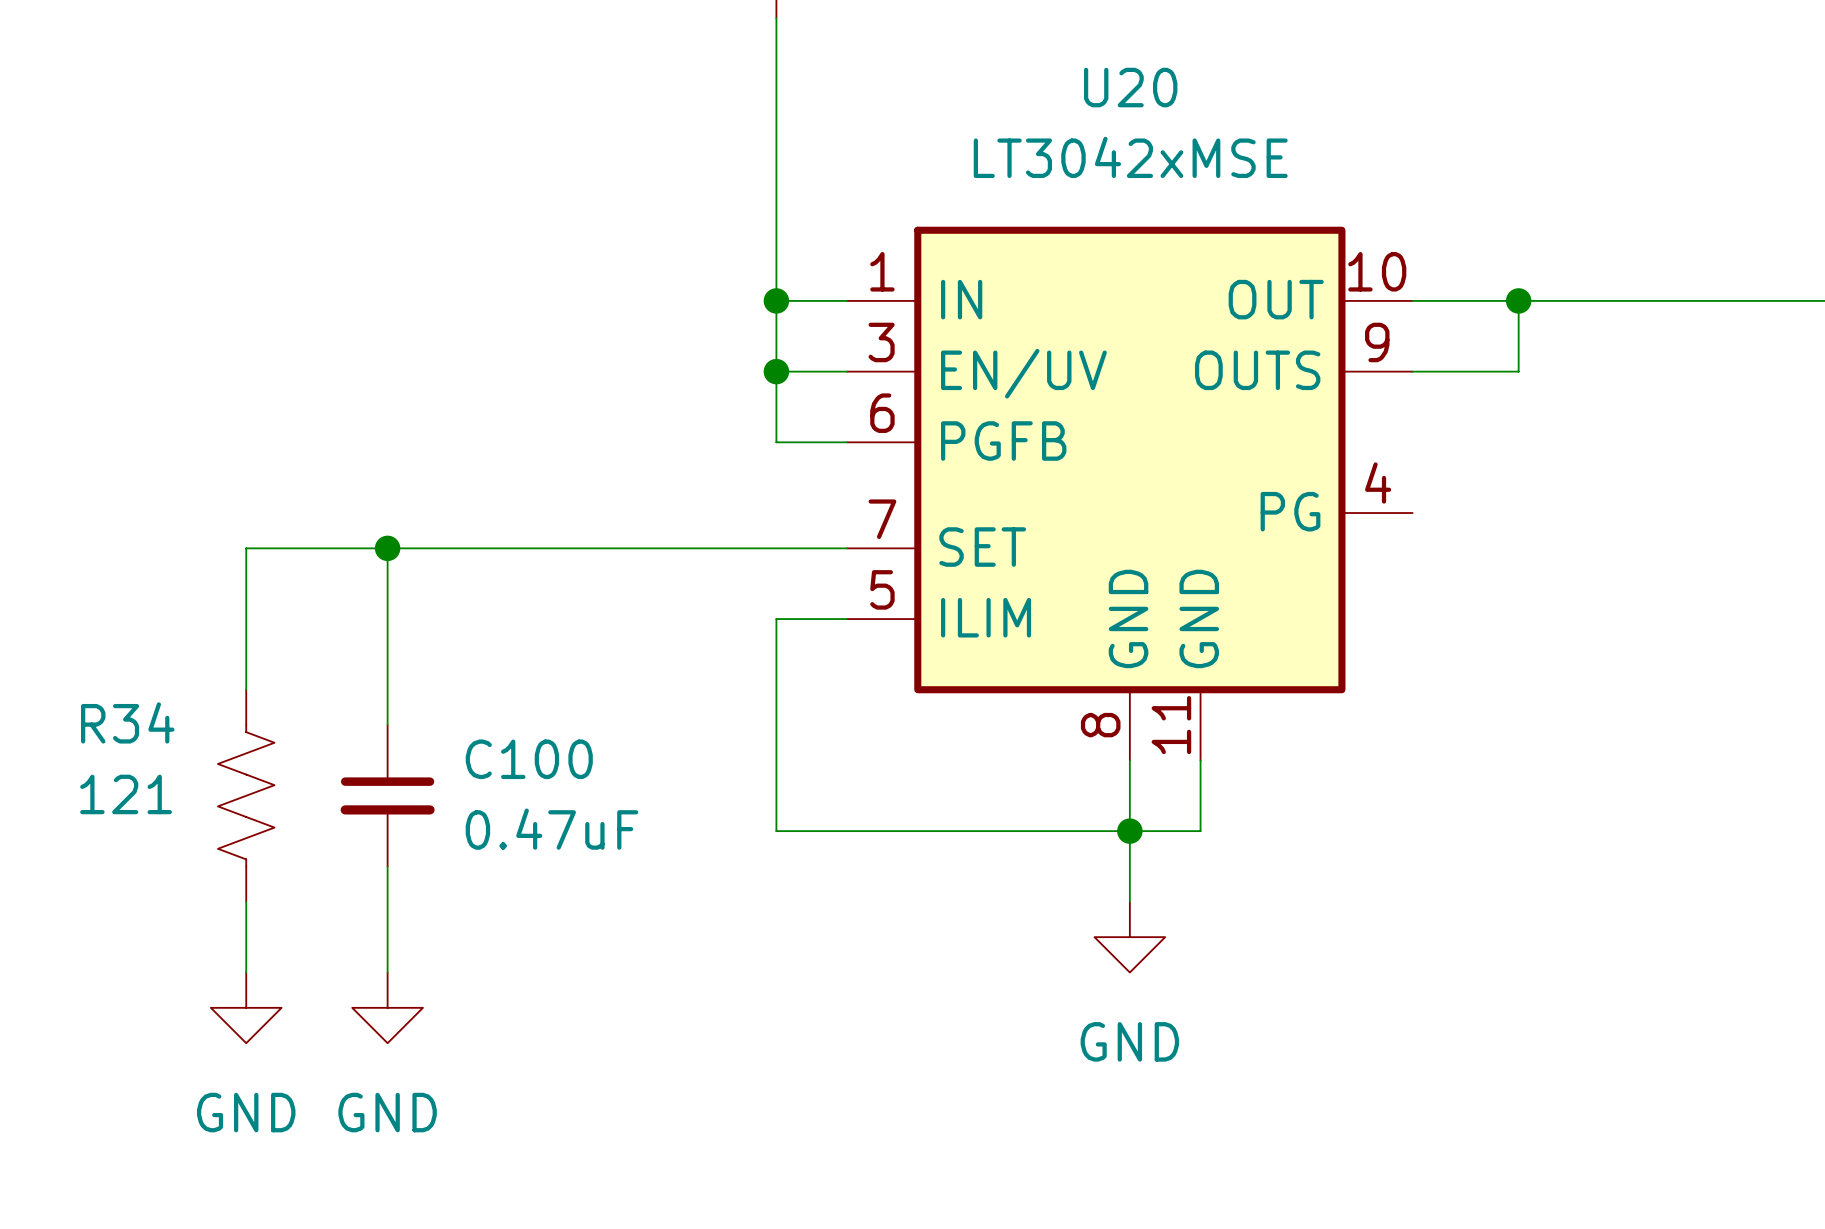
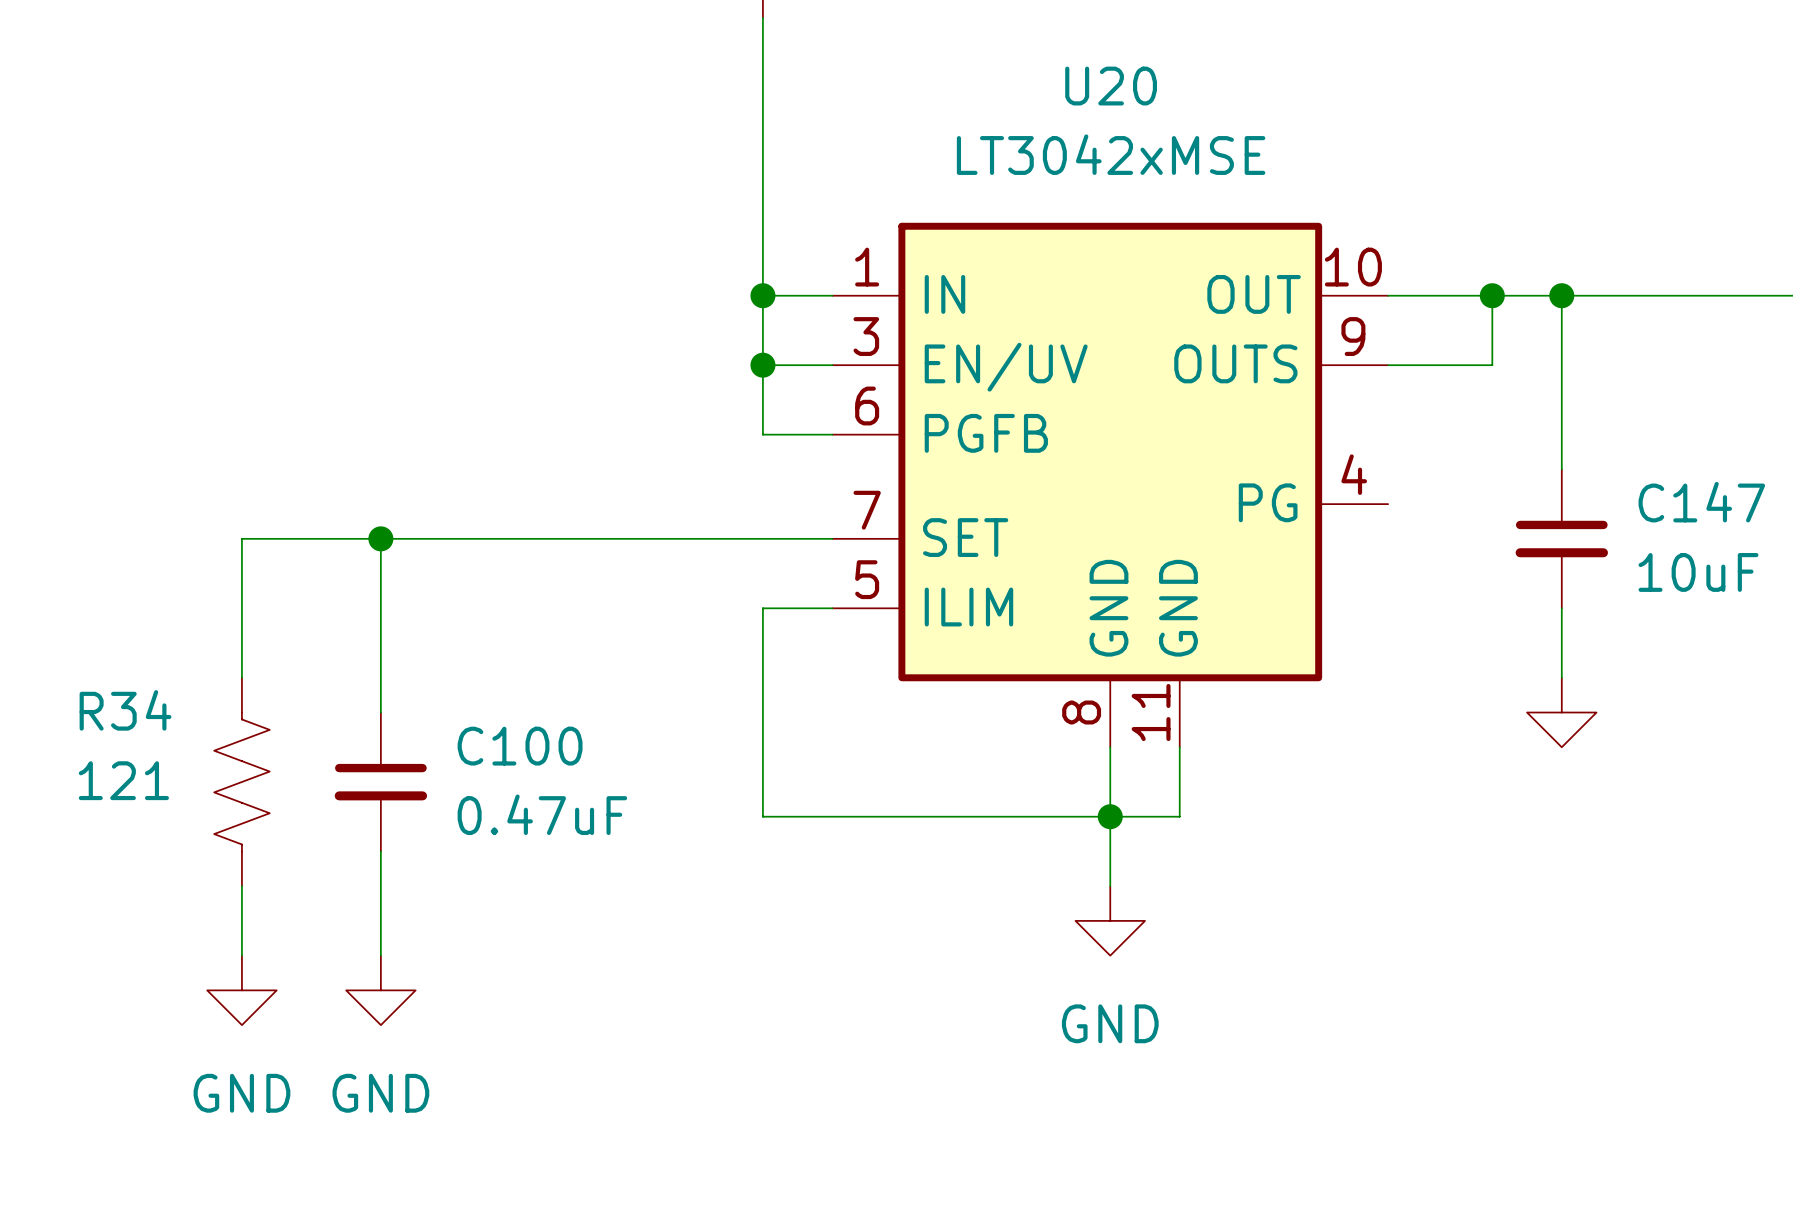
wire: none -> (1561, 295) (1561, 469)
junction: none -> (1561, 295)
C147: none -> 10uF (1561, 538)
wire: none -> (1561, 608) (1561, 677)
power symbol: none -> (1561, 712)

